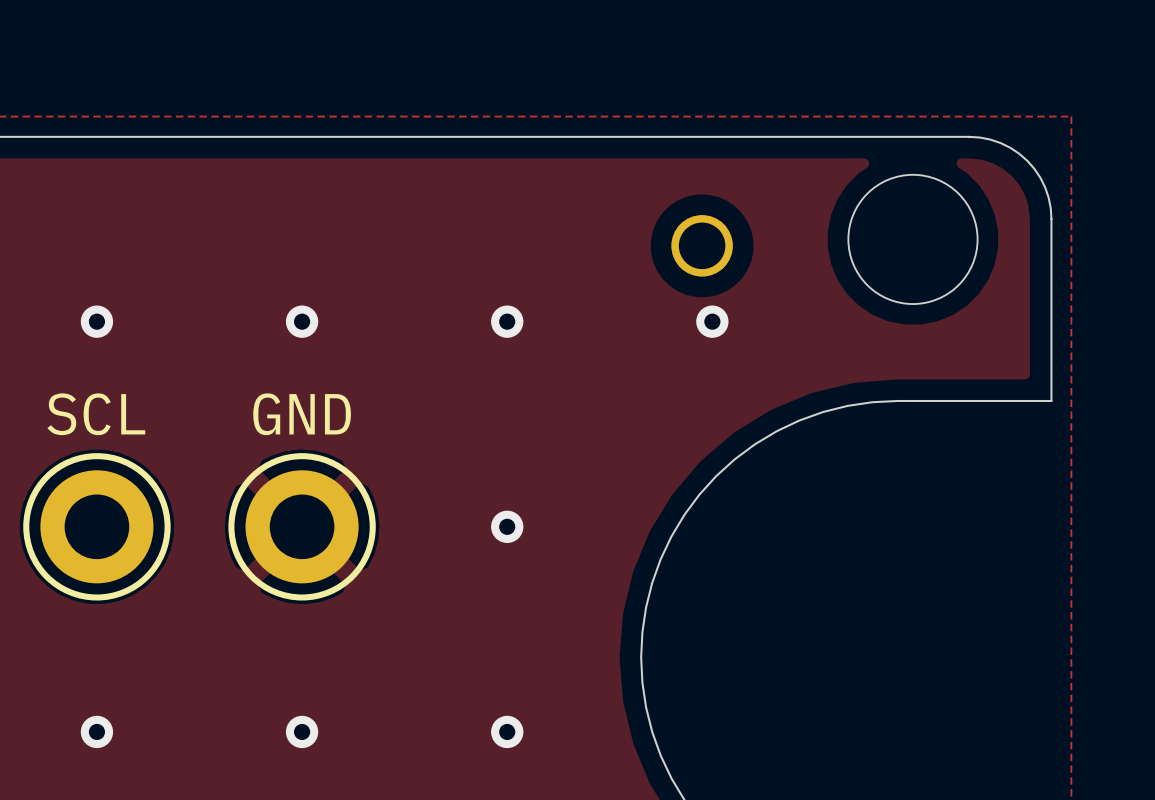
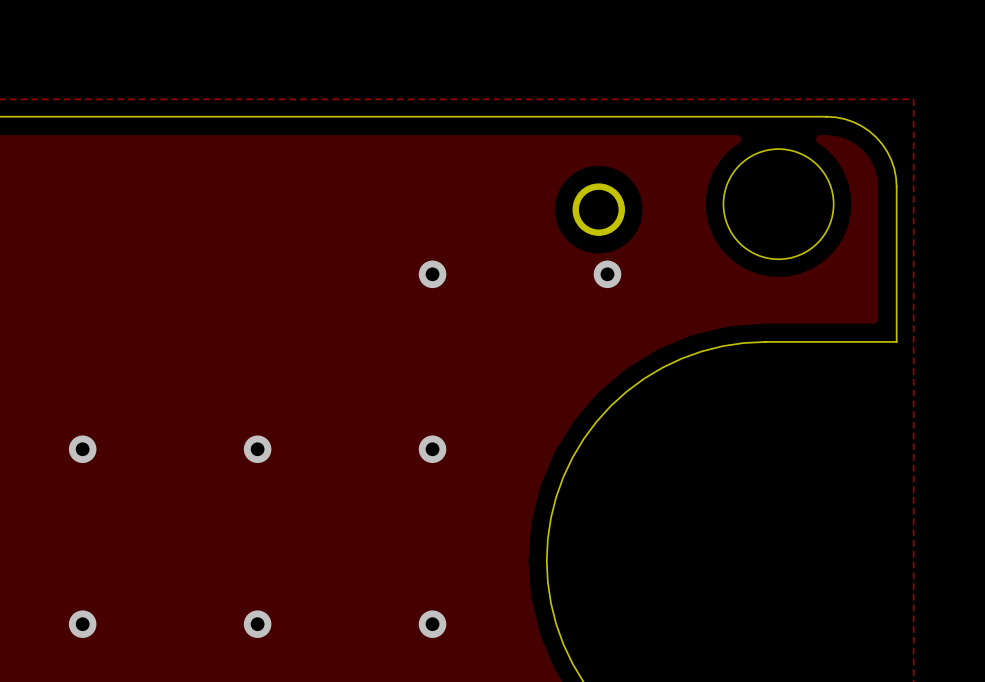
via: (96, 321) -> none
via: (302, 321) -> none
SCL: (96, 526) -> none
via: none -> (82, 449)
GND: (302, 526) -> none
via: none -> (257, 449)

